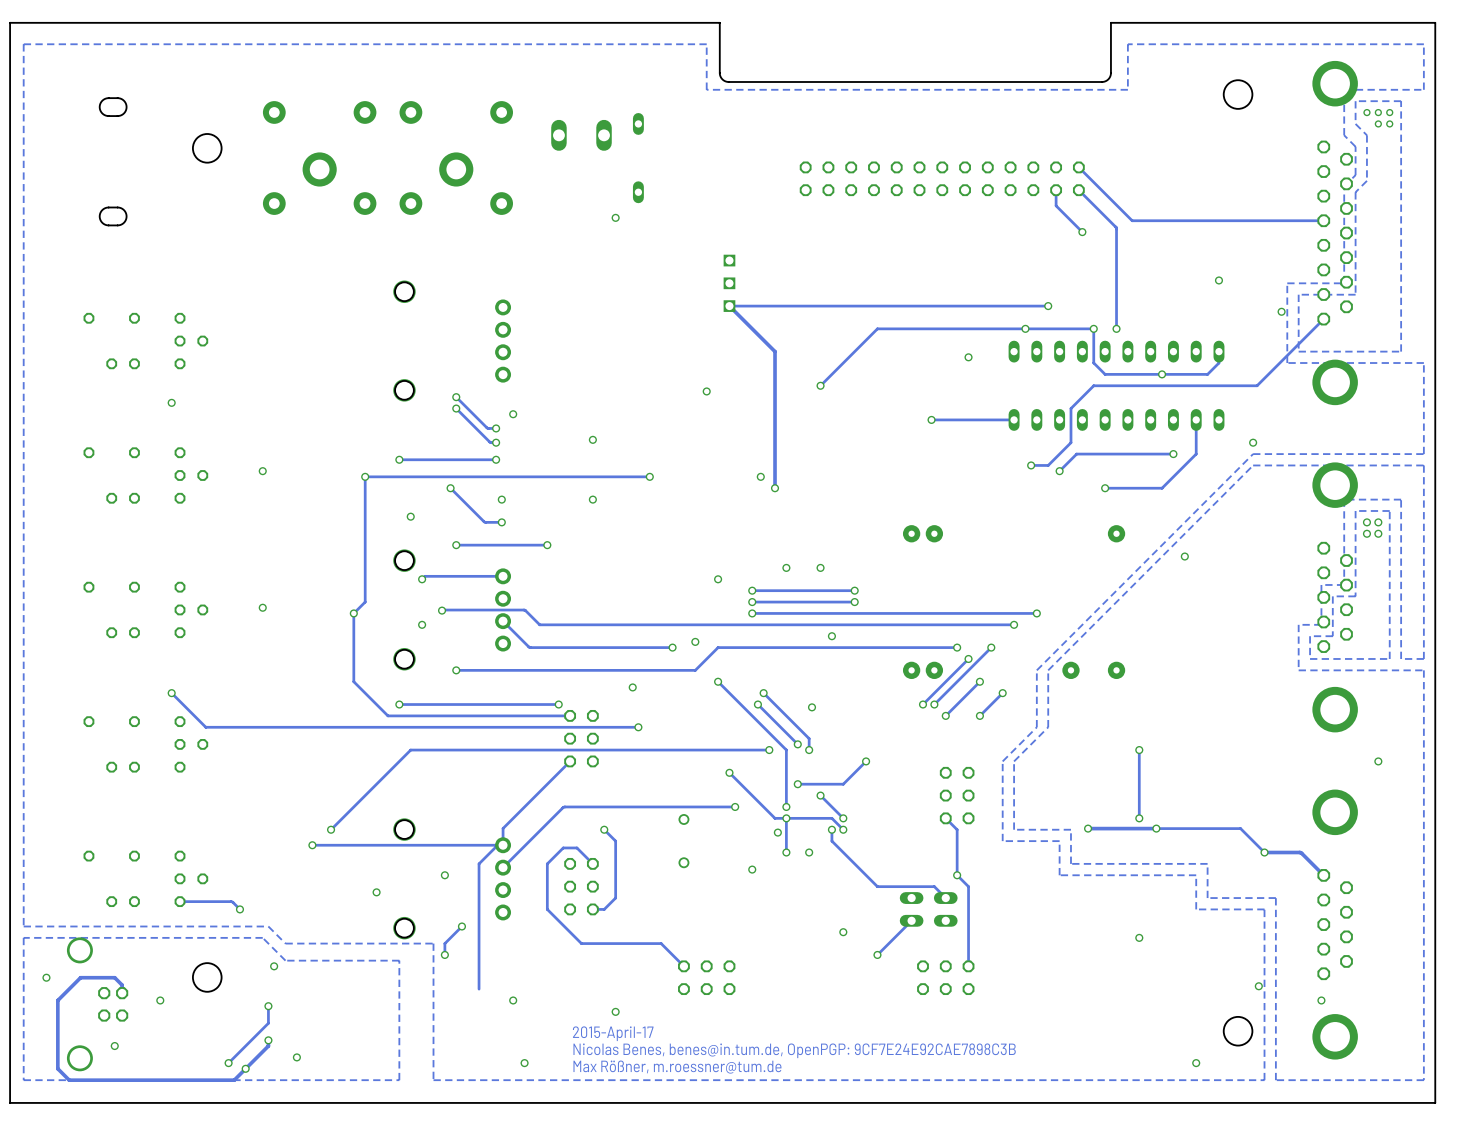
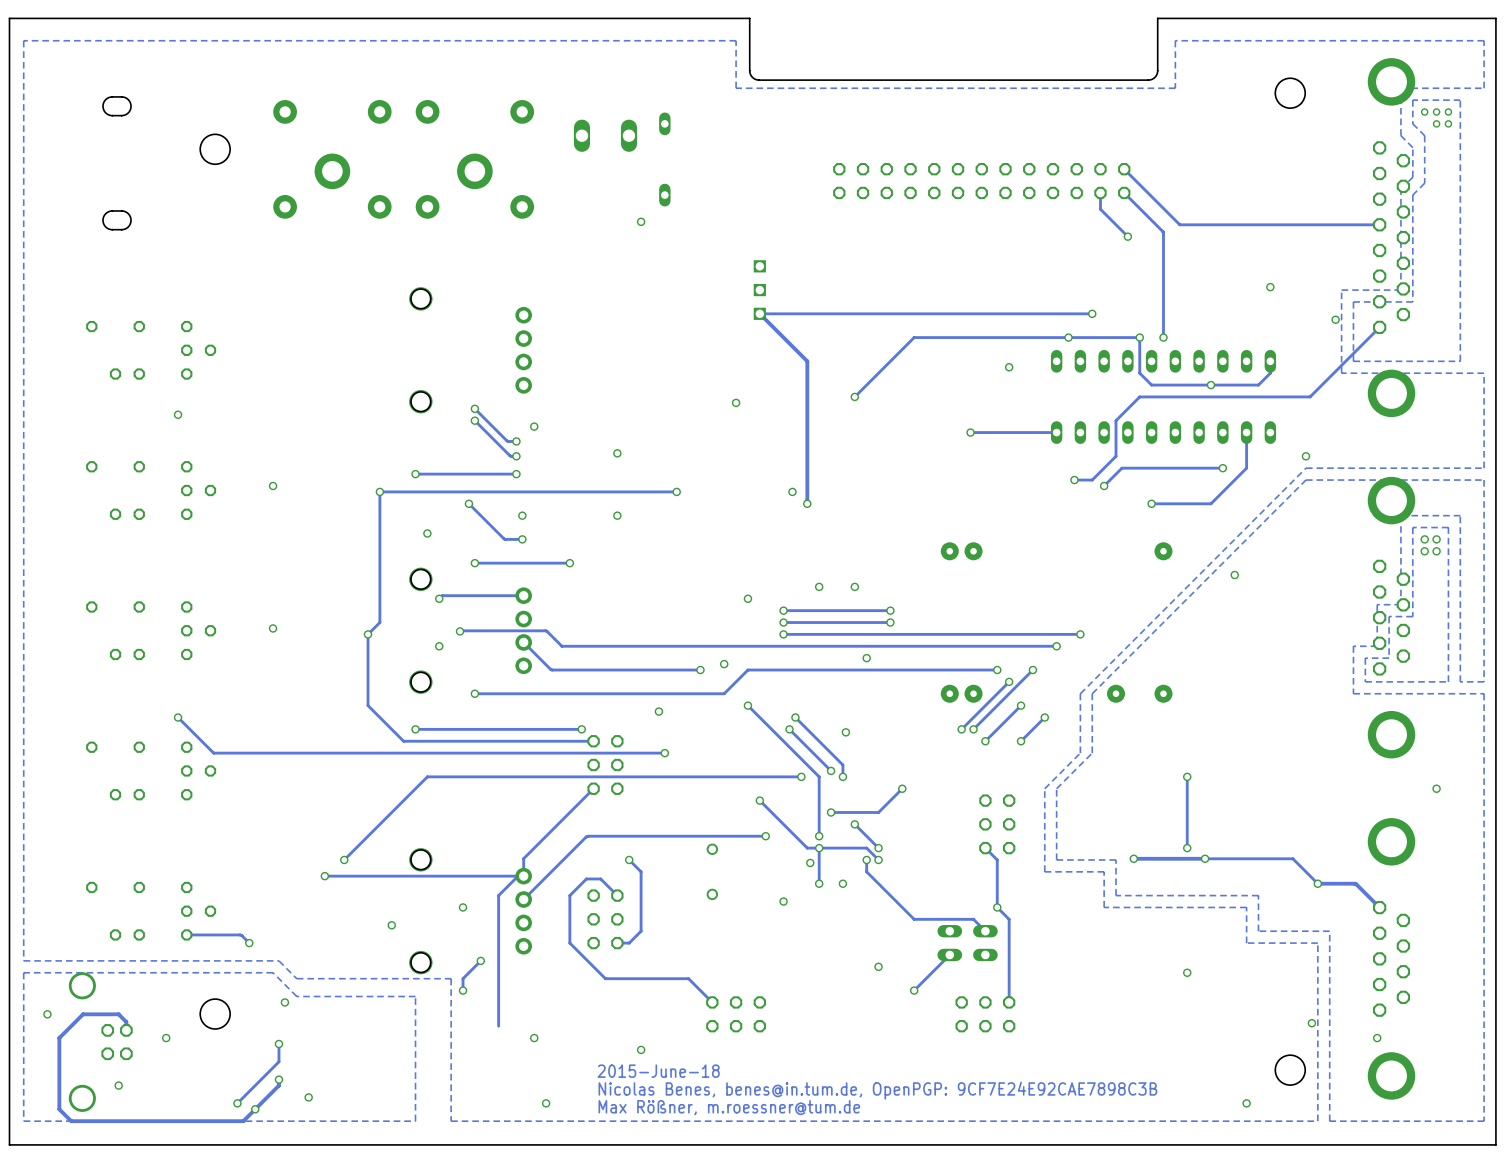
text: 2015-April-17 (613, 1033) -> 2015-June-18 (658, 1071)

